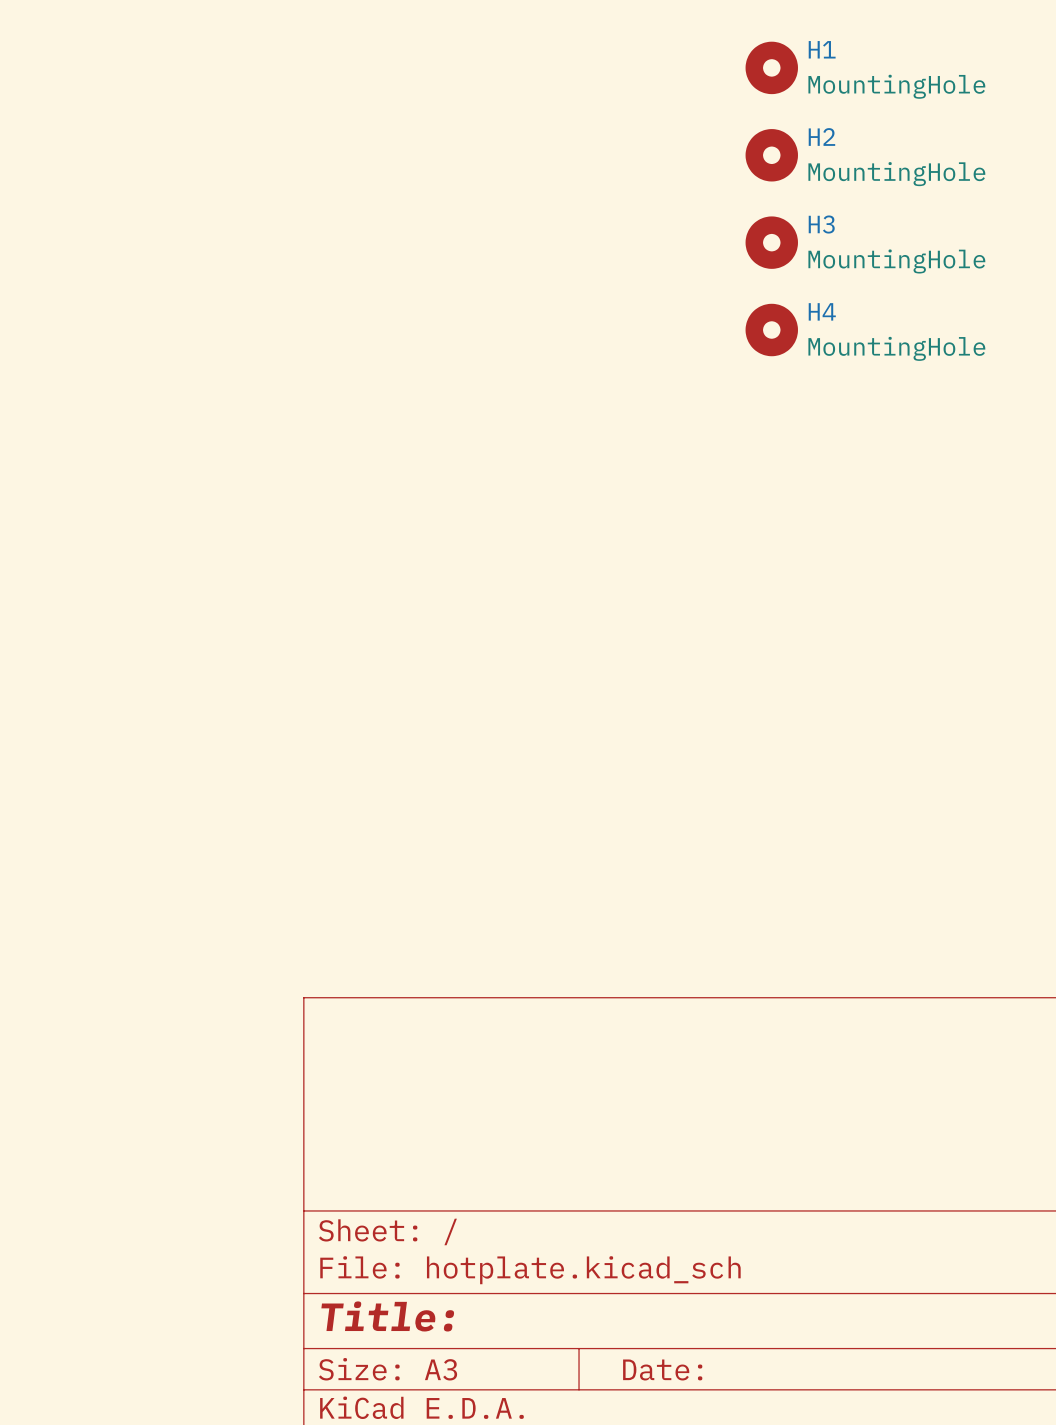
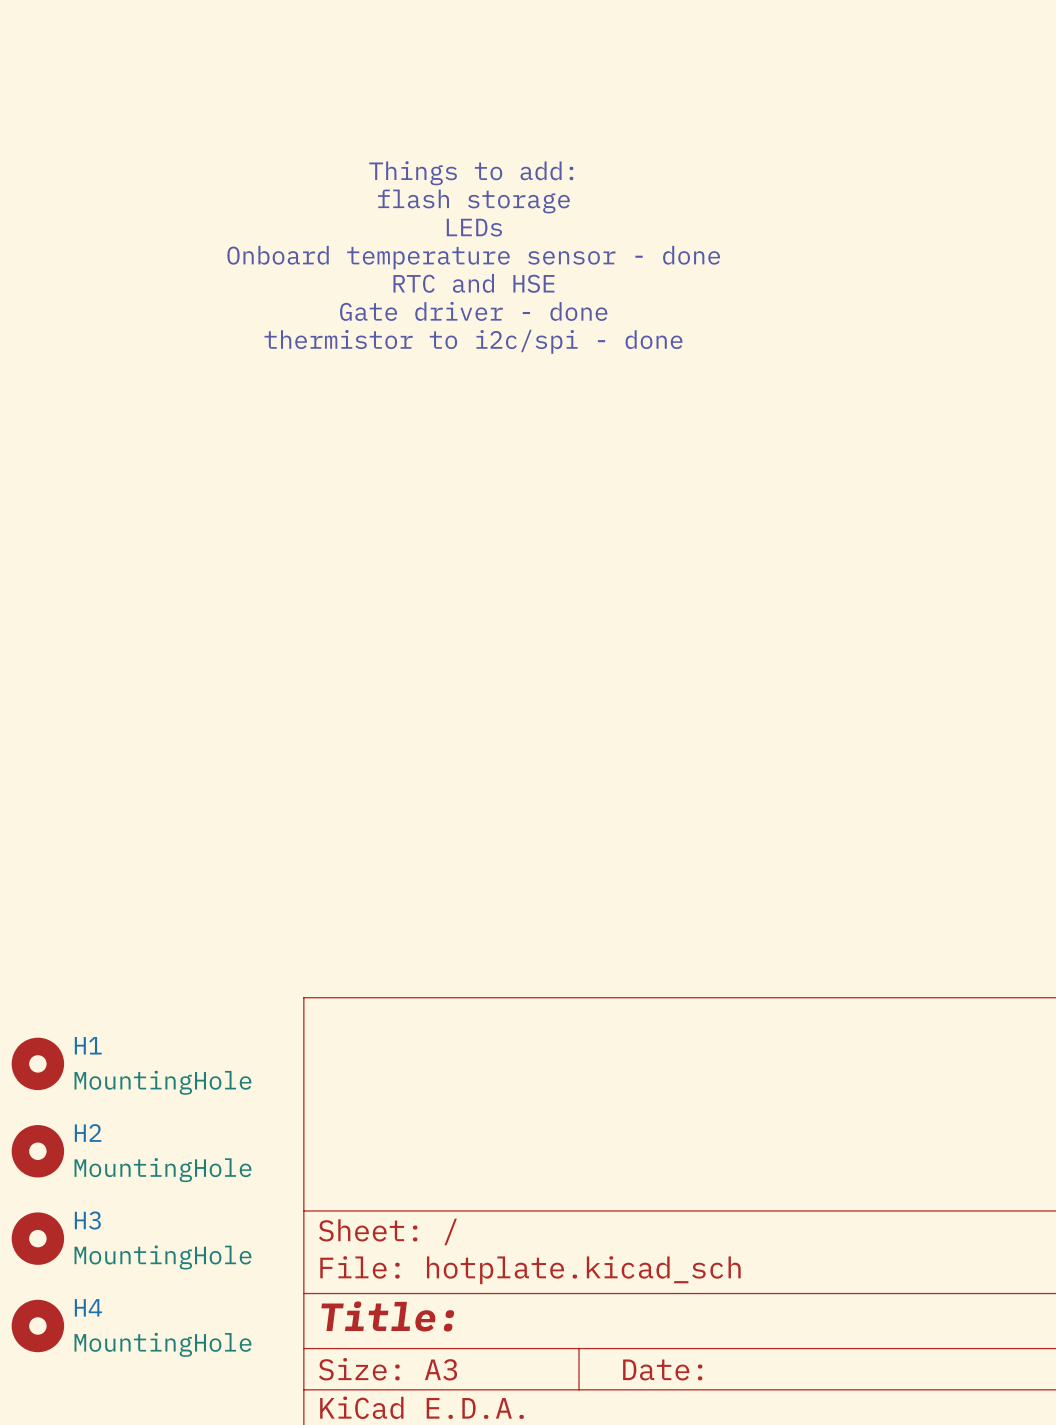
H1 position: (771, 67) -> (37, 1063)
H2 position: (771, 155) -> (37, 1151)
text: none -> Things to add: (471, 173)
text: none -> flash storage (473, 201)
text: none -> LEDs (474, 227)
H3 position: (771, 242) -> (37, 1238)
text: none -> Onboard temperature sensor - done (473, 257)
text: none -> RTC and HSE (473, 283)
text: none -> Gate driver - done (473, 311)
H4 position: (771, 330) -> (37, 1326)
text: none -> thermistor to i2c/spi - done (473, 341)

